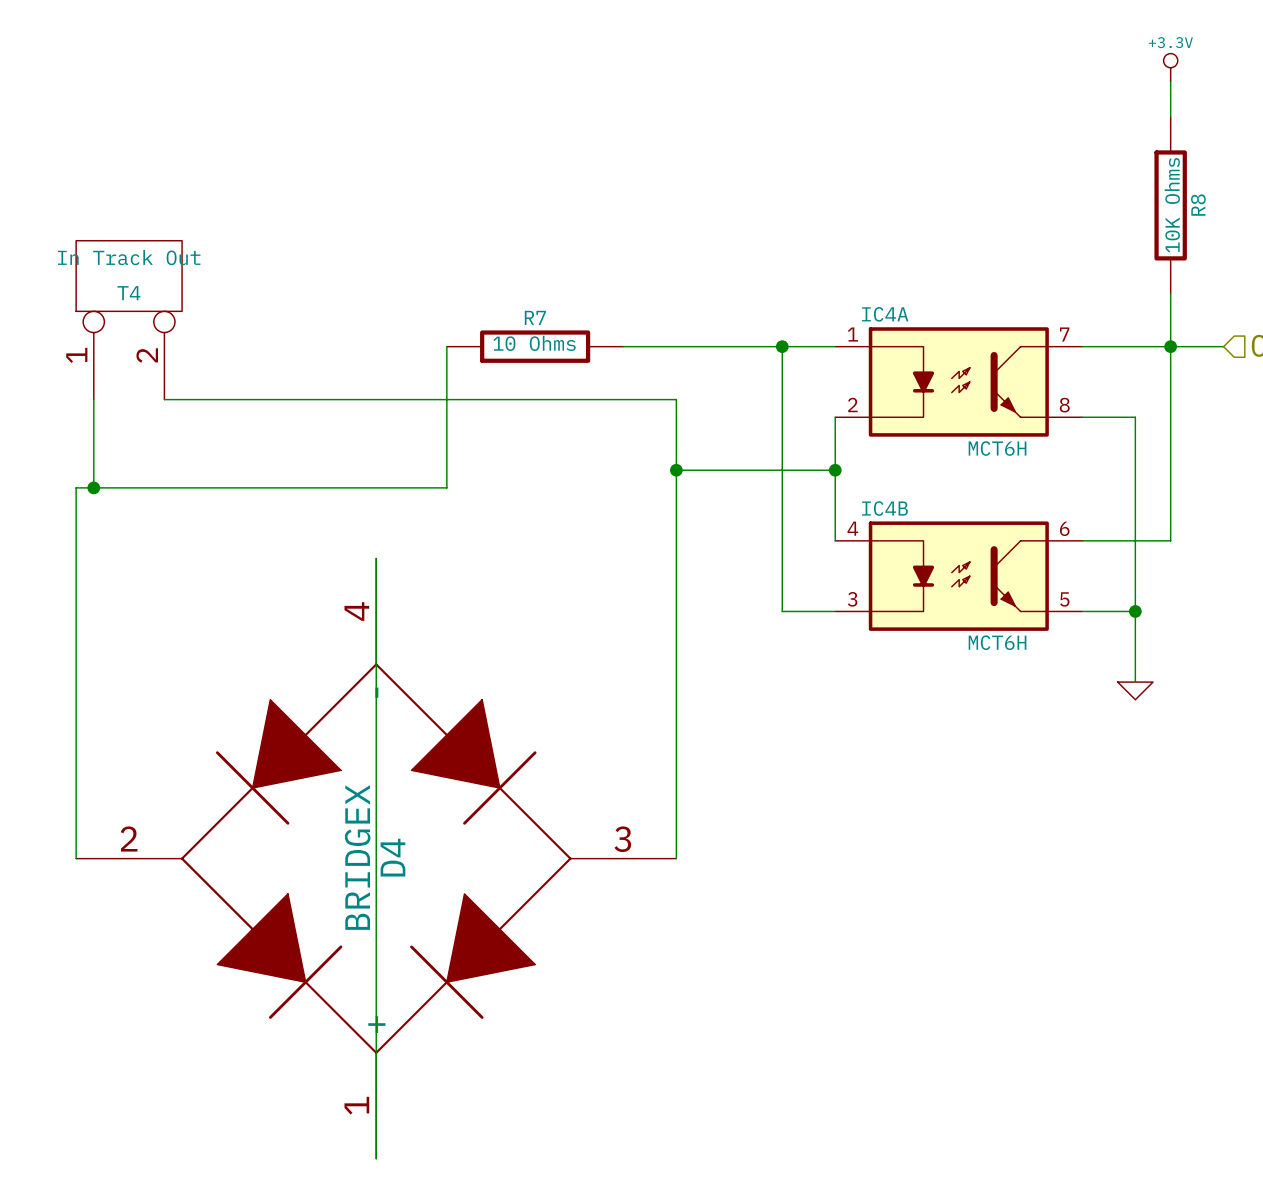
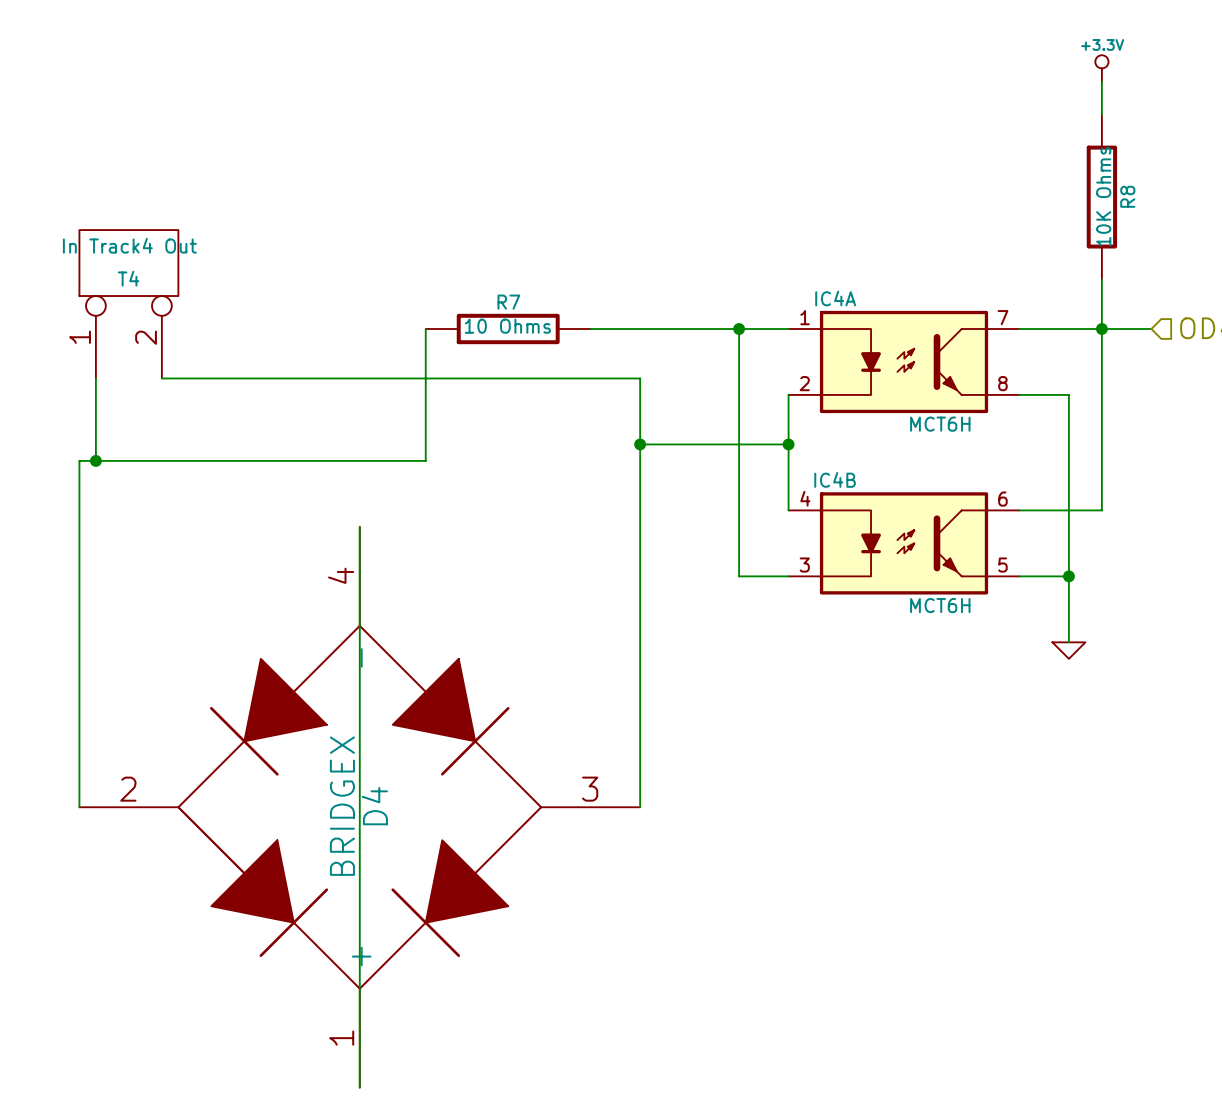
T4 value: In Track Out (129, 257) -> In Track4 Out (129, 245)

